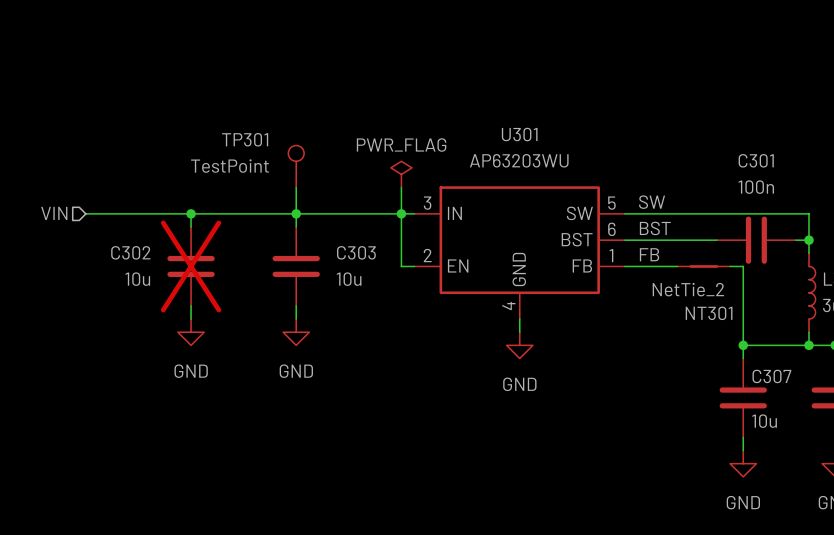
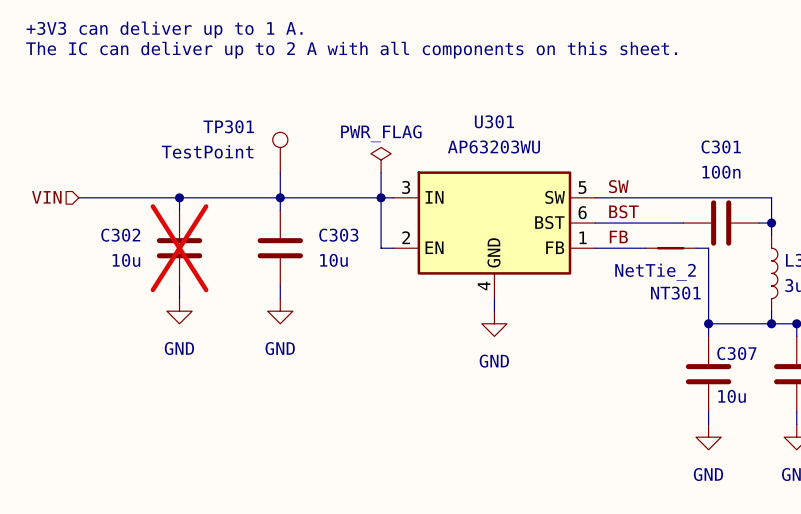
text: none -> +3V3 can deliver up to 1 A. (164, 29)
text: none -> The IC can deliver up to 2 A with all components on this sheet. (351, 50)

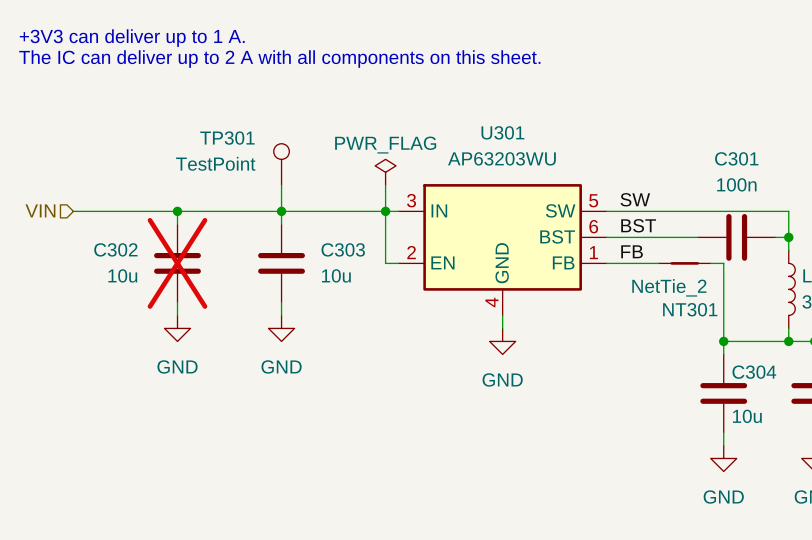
C307 name: C307 (736, 353) -> C304 (754, 372)

